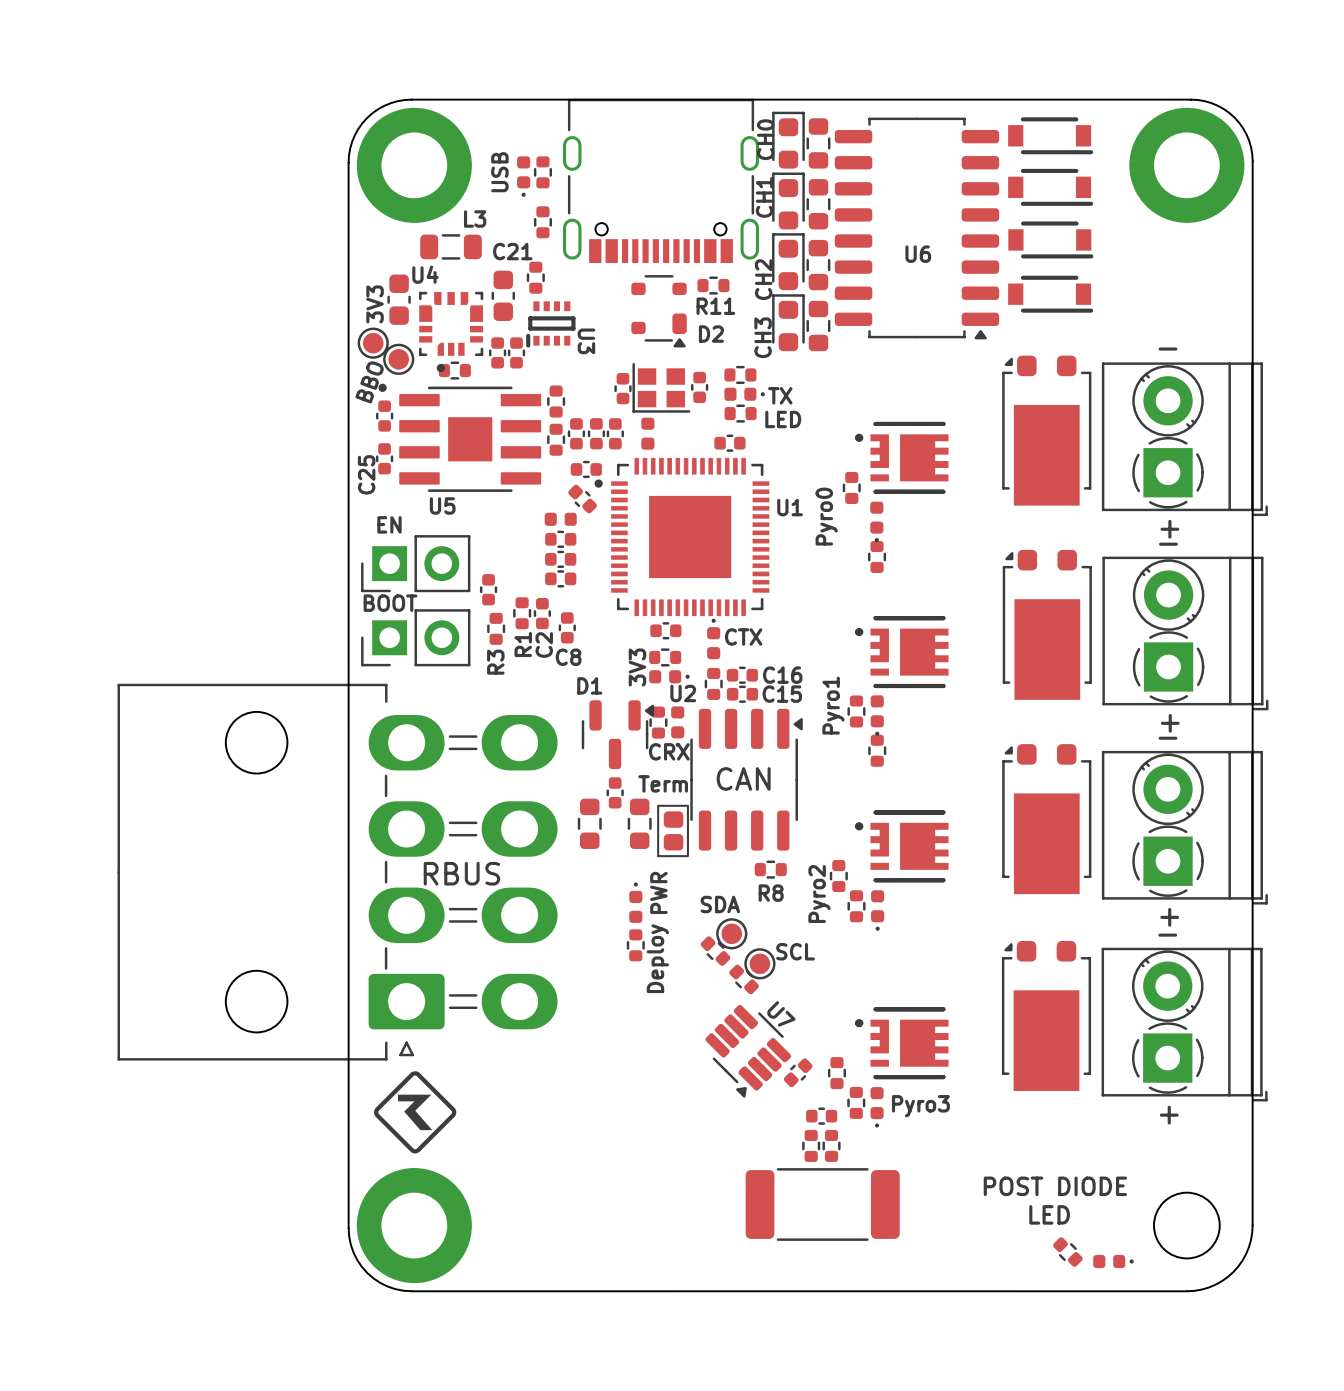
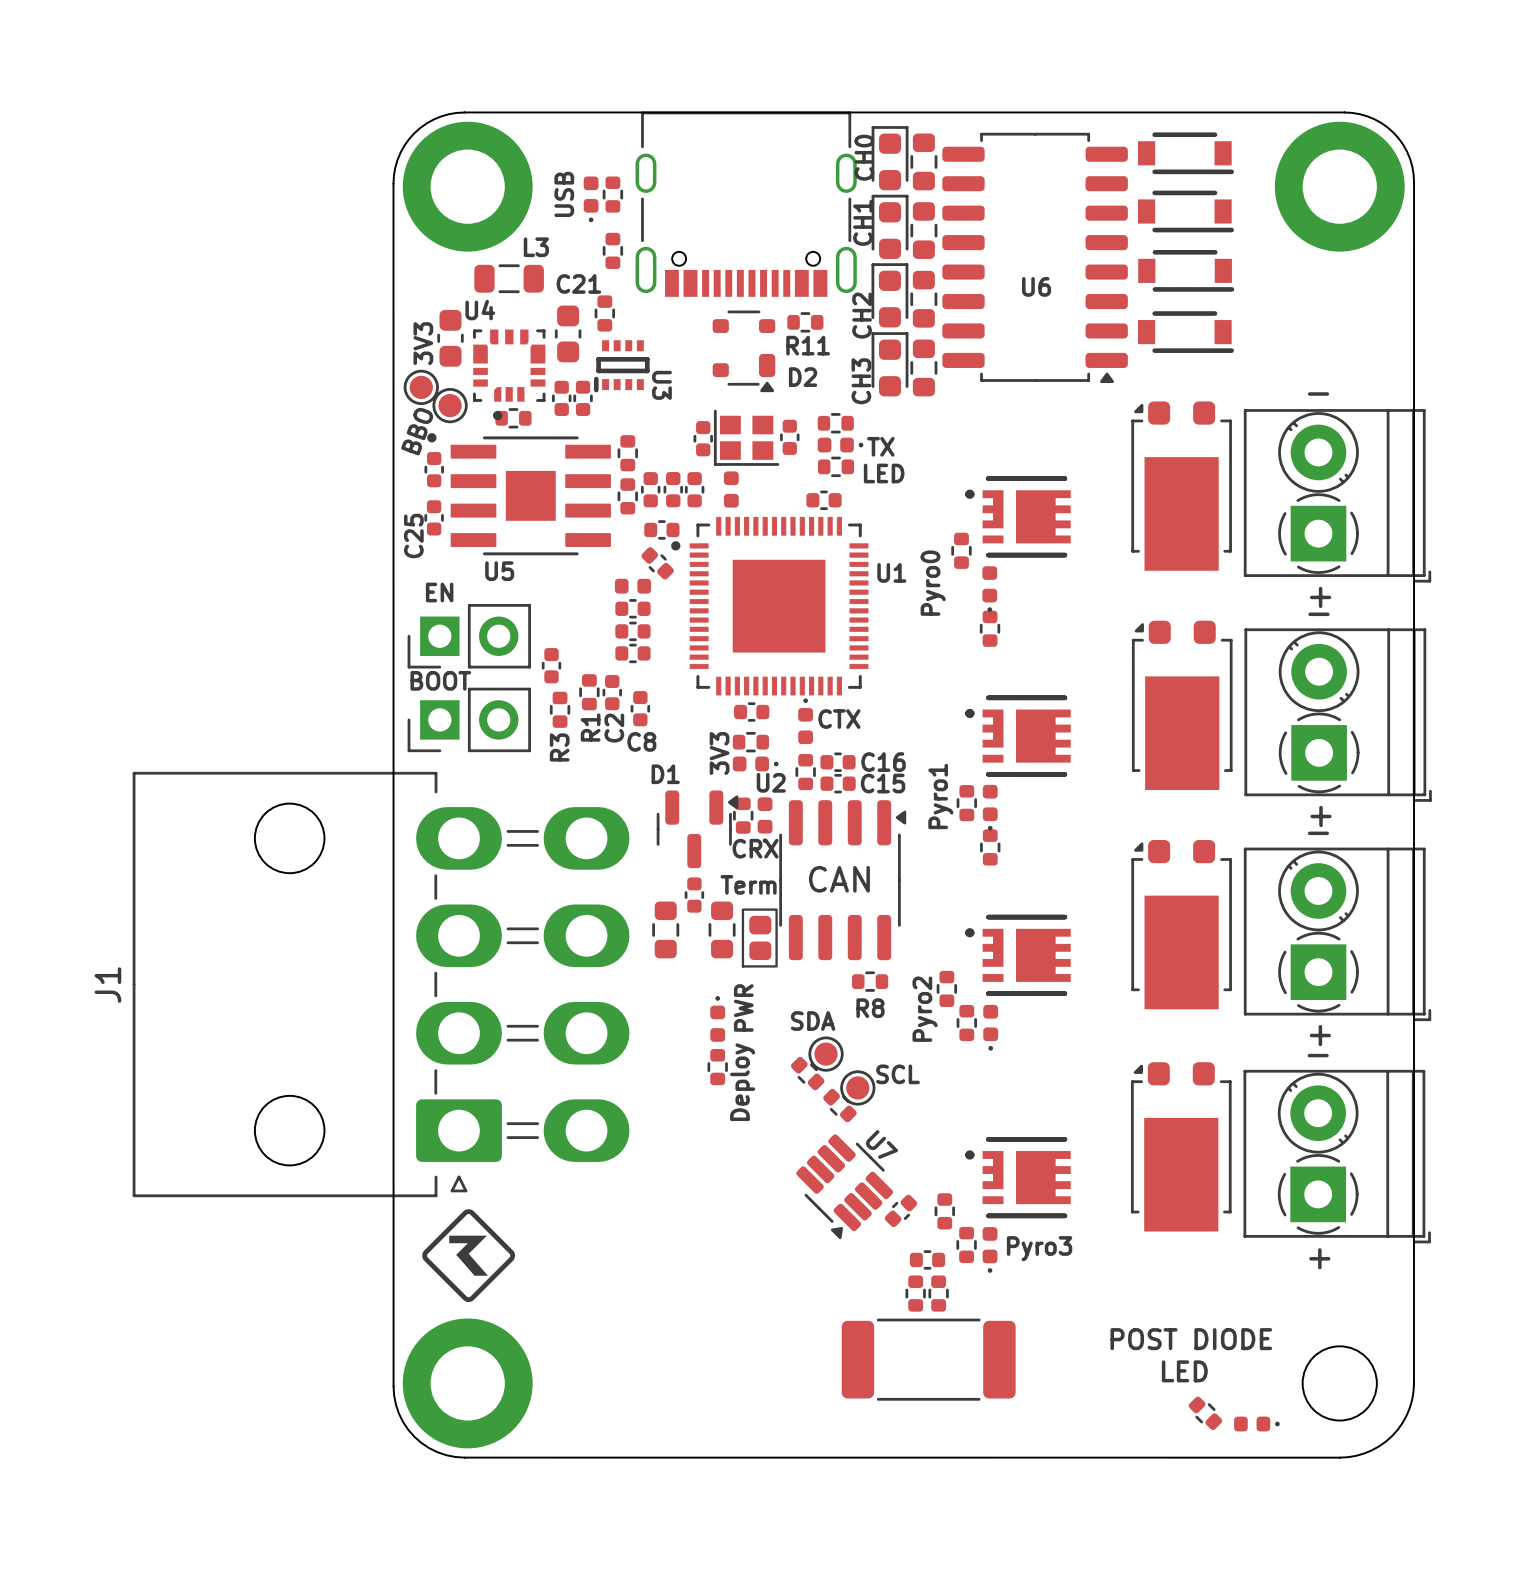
J1 name: none -> J1 (107, 985)
J1 text: RBUS (461, 873) -> none

